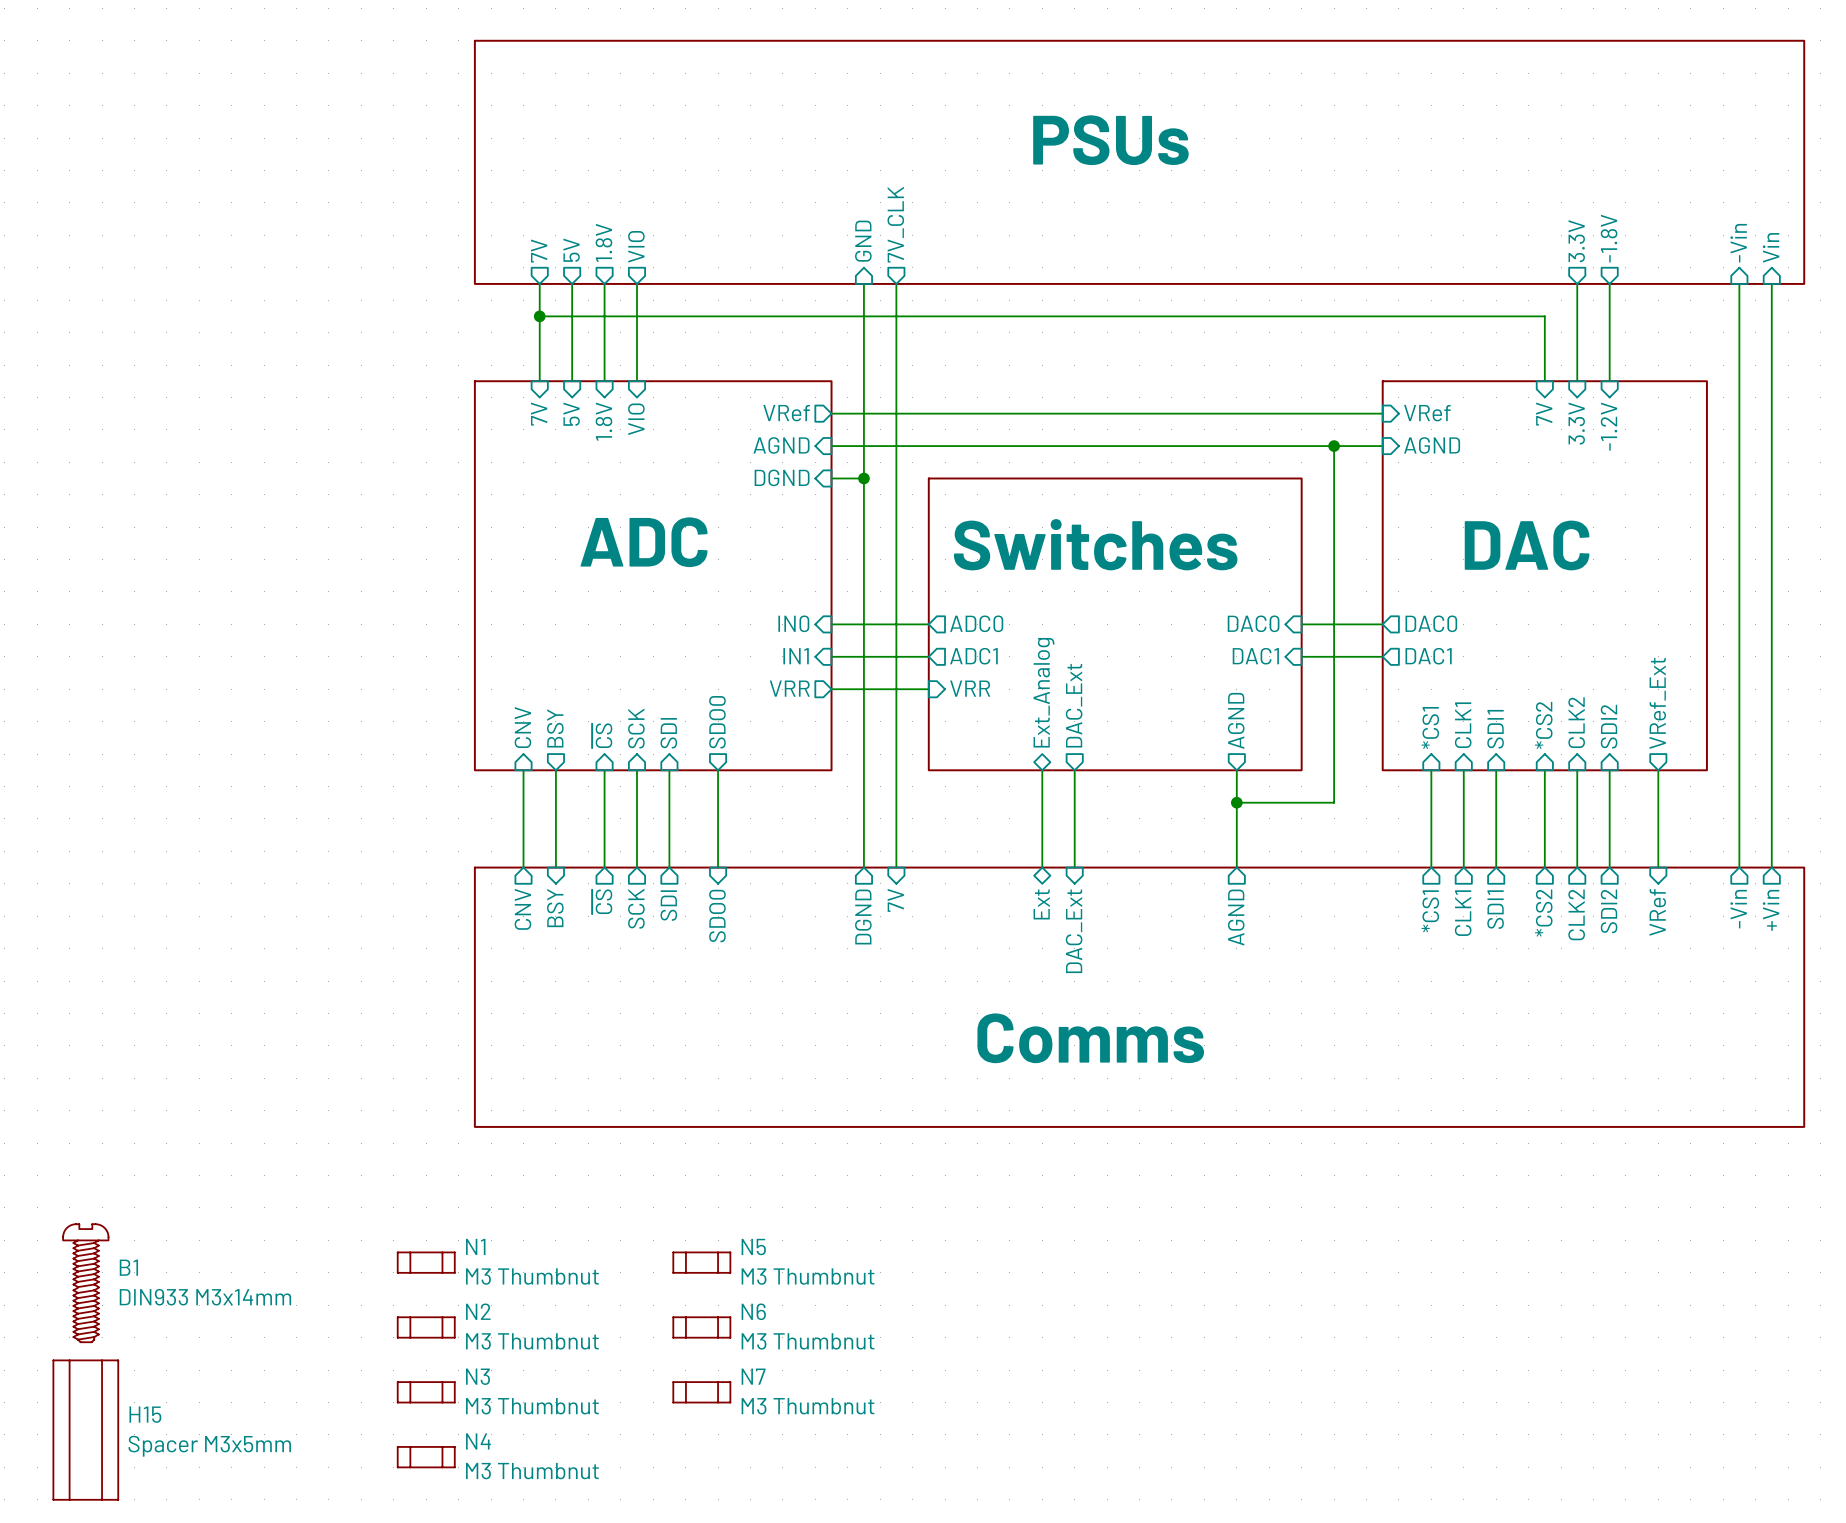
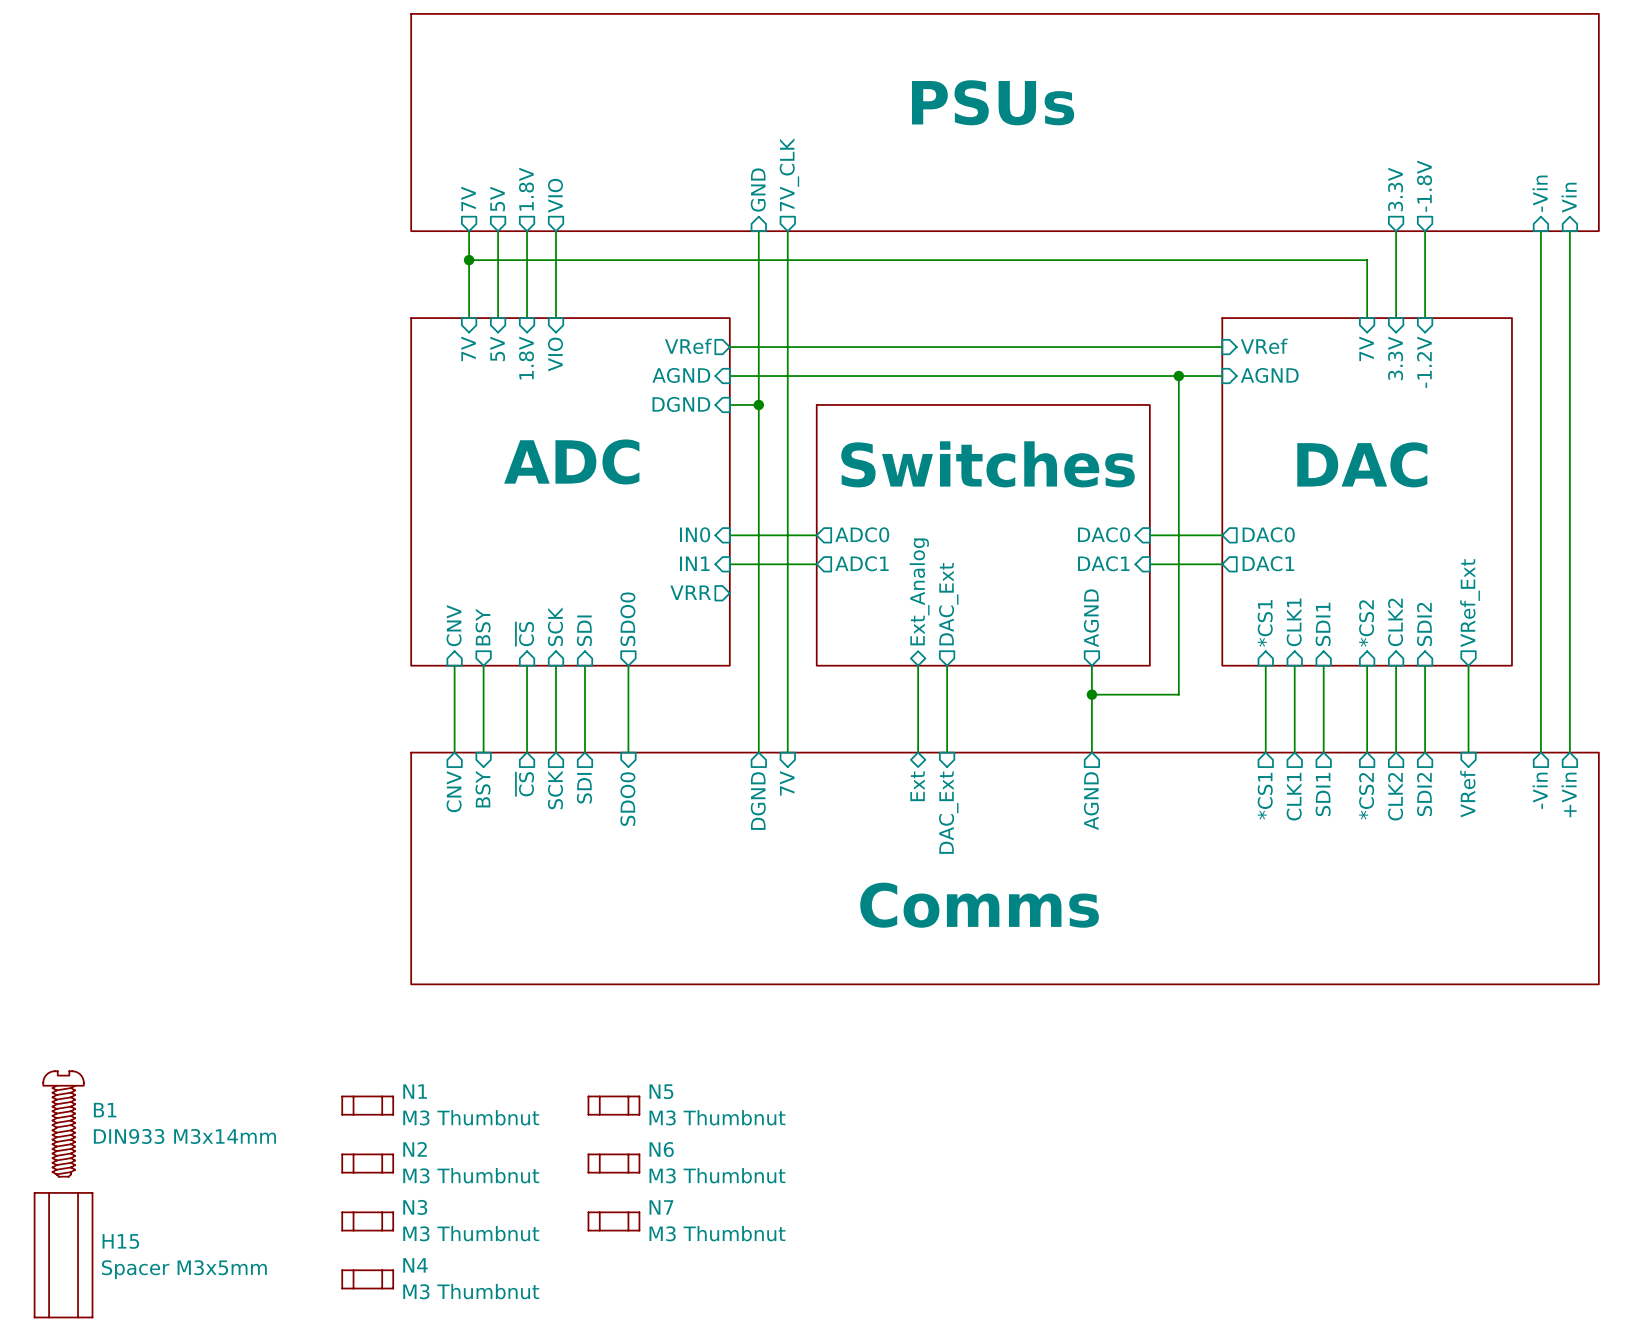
sheet pin: VRR (970, 688) -> none
wire: (831, 689) (928, 689) -> none

